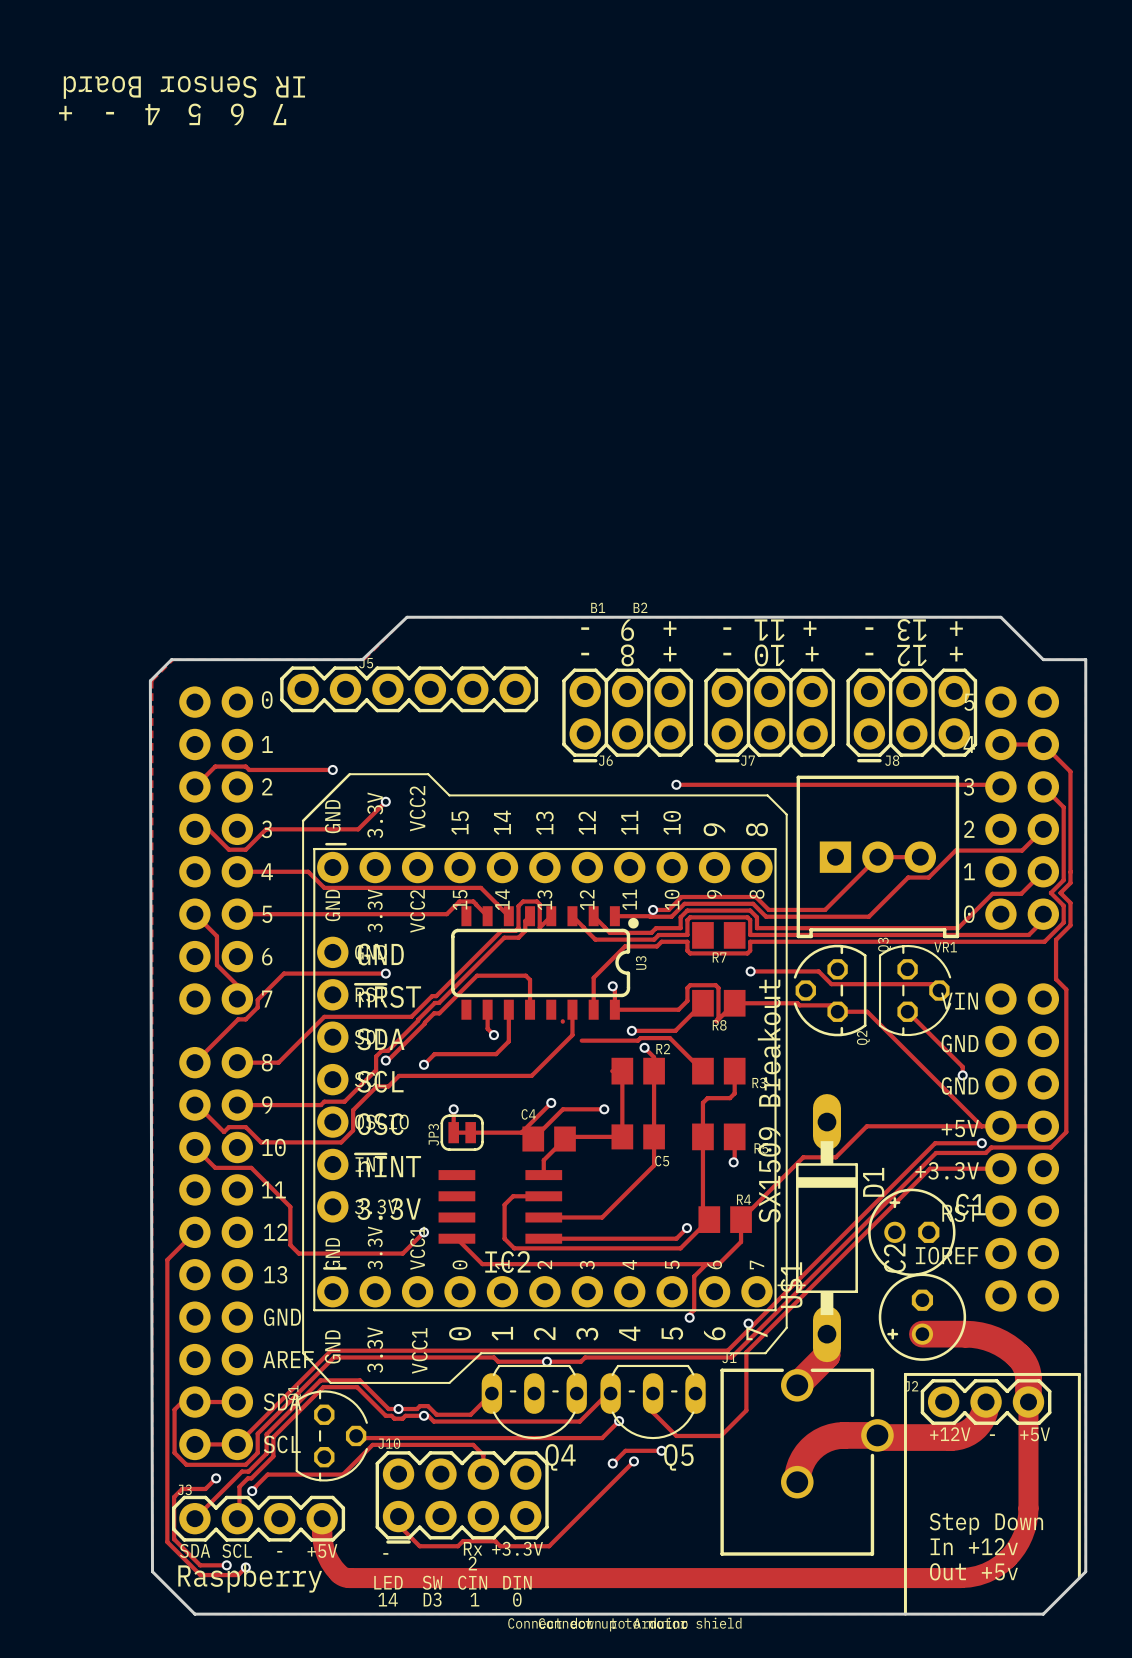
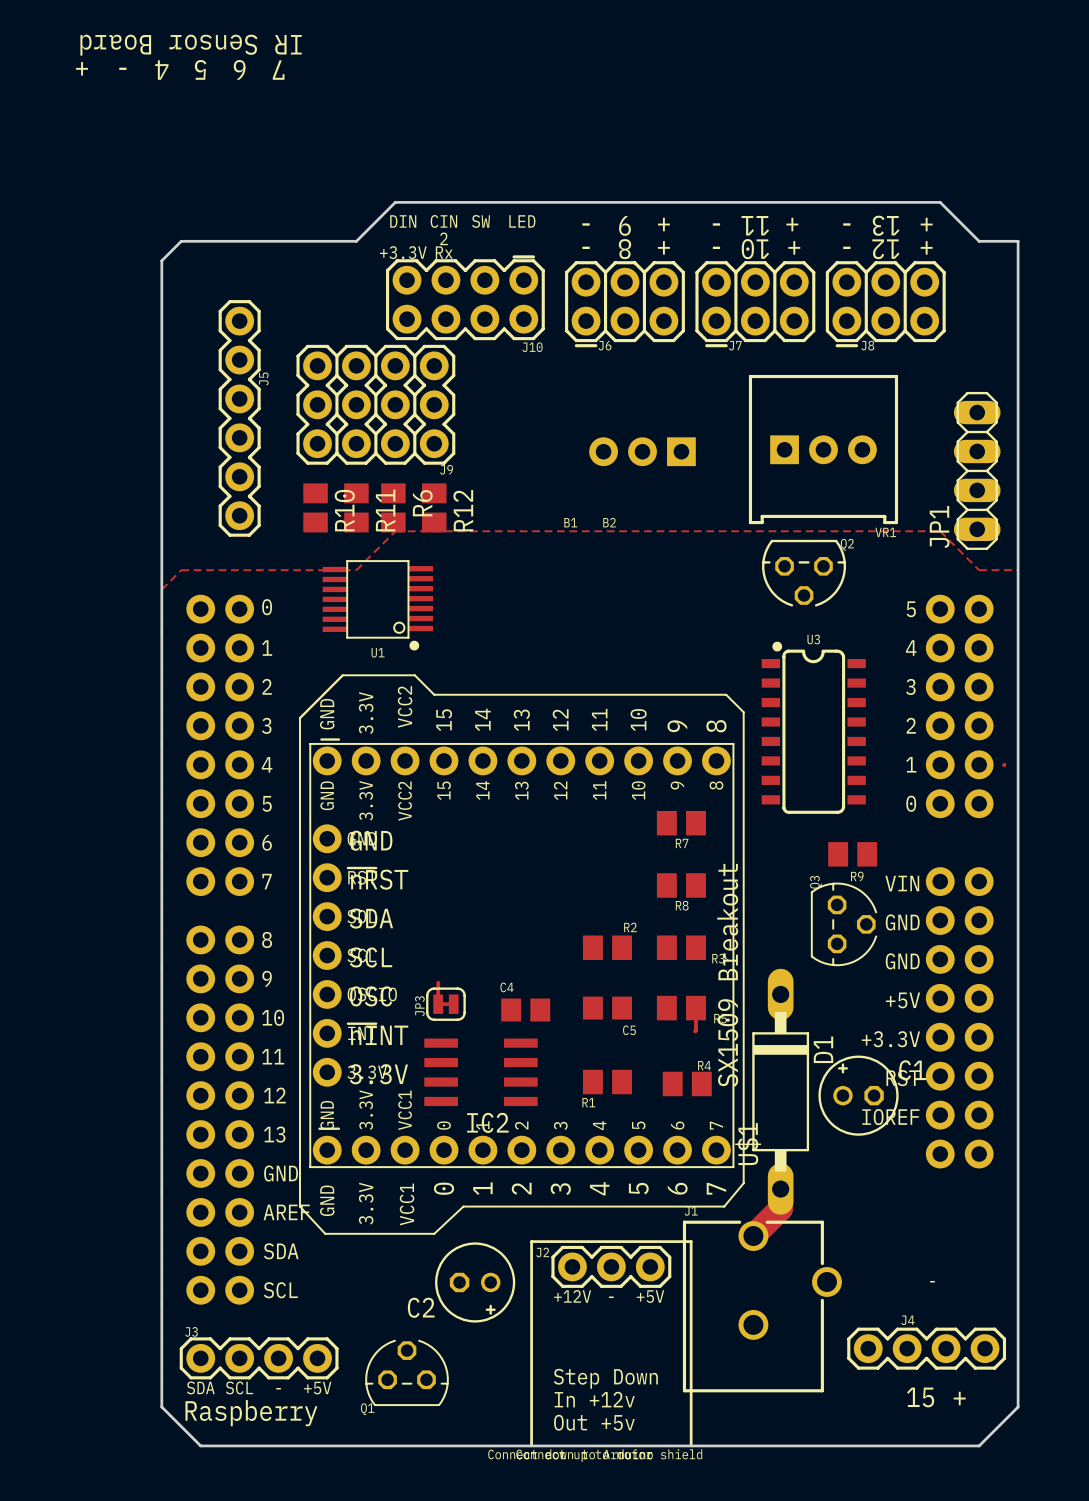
text: none -> DIN (403, 221)
text: none -> CIN (443, 221)
text: none -> SW (481, 221)
text: none -> LED (522, 221)
text: none -> - (586, 224)
text: none -> + (663, 224)
text: none -> - (716, 224)
text: none -> + (792, 224)
text: none -> - (846, 224)
text: none -> + (926, 224)
text: none -> 2 (444, 238)
text: none -> - (586, 247)
text: none -> + (663, 247)
text: none -> - (716, 247)
text: none -> + (794, 247)
text: none -> - (846, 247)
text: none -> + (926, 247)
text: none -> +3.3V (403, 252)
text: none -> Rx (444, 252)
J9: none -> (375, 404)
part: none -> (642, 451)
JP1: none -> (977, 470)
R10: none -> (315, 507)
R11: none -> (356, 507)
R6: none -> (393, 507)
R12: none -> (434, 507)
text: - (585, 628) -> none
text: + (670, 628) -> none
text: - (727, 628) -> none
text: + (810, 628) -> none
text: - (869, 628) -> none
text: + (956, 628) -> none
text position: 11 (769, 629) -> 11 (755, 225)
text position: 13 (912, 629) -> 13 (886, 225)
text position: 9 (627, 630) -> 9 (624, 225)
text: - (585, 654) -> none
text: + (670, 654) -> none
text: - (727, 654) -> none
text: + (812, 654) -> none
text: - (869, 654) -> none
text: + (956, 654) -> none
text position: 8 (627, 655) -> 8 (624, 249)
text position: 10 (769, 655) -> 10 (755, 249)
text position: 12 (911, 655) -> 12 (885, 249)
board edge: (1085, 659) (1043, 659) (1000, 617) (407, 617) (362, 659) (171, 659) (150, 680) (152, 1571) -> (1018, 570) (1018, 241) (979, 241) (940, 202) (395, 202) (356, 241) (181, 241) (161, 260) (161, 1407)
J5 rotation: 0° (409, 689) -> 90° clockwise (239, 418)
J5 position: (409, 689) -> (239, 418)
U1: none -> (377, 605)
J6 position: (627, 715) -> (624, 304)
J7 position: (769, 715) -> (755, 304)
J8 position: (911, 715) -> (885, 304)
track: (1000, 744) (1043, 744) (1070, 771) (1070, 883) (1060, 892) (1070, 902) (1070, 925) (1056, 939) (1056, 979) (1066, 989) (1066, 1132) (1050, 1147) (991, 1147) (985, 1152) (936, 1152) (731, 1357) (585, 1357) (580, 1361) (498, 1361) (493, 1357) (333, 1357) (257, 1433) (257, 1452) (245, 1464) (186, 1464) (174, 1452) (174, 1409) (182, 1402) (237, 1402) -> none
track: (332, 769) (249, 769) (245, 766) (215, 766) (194, 786) -> none
via: (332, 769) -> none
track: (676, 784) (998, 784) (1000, 786) -> none
via: (676, 784) -> none
track: (1043, 786) (1063, 807) (1063, 880) (1050, 892) (1063, 905) (1063, 922) (1044, 941) (750, 941) (750, 950) (747, 953) (690, 953) (687, 950) (687, 941) (661, 941) (656, 946) (625, 946) (593, 977) (593, 1009) -> none
track: (385, 801) (358, 829) (266, 829) (245, 849) (228, 849) (208, 829) (194, 829) -> none
via: (385, 801) -> none
track: (1043, 829) (1022, 850) (955, 850) (928, 877) (908, 877) (868, 916) (766, 916) (753, 903) (684, 903) (671, 916) (614, 916) -> none
VR1 position: (877, 856) -> (823, 449)
track: (920, 857) (877, 857) (825, 909) (768, 909) (755, 897) (681, 897) (668, 909) (653, 909) -> none
track: (237, 871) (308, 871) (324, 887) (480, 887) (508, 916) -> none
track: (1043, 871) (1021, 893) (992, 893) (958, 928) (756, 928) (756, 917) (750, 910) (687, 910) (680, 917) (680, 928) (656, 928) (651, 932) (609, 932) (593, 916) -> none
via: (653, 909) -> none
track: (194, 914) (216, 936) (216, 965) (237, 985) (237, 999) -> none
track: (237, 914) (446, 914) (459, 901) (473, 901) (487, 916) -> none
track: (1043, 914) (1043, 920) (1028, 934) (750, 934) (750, 920) (747, 917) (690, 917) (687, 920) (687, 934) (658, 934) (654, 939) (595, 939) (572, 916) -> none
track: (530, 916) (525, 920) (525, 930) (518, 937) (504, 937) (439, 1002) (434, 1002) (388, 1050) (381, 1050) (376, 1056) (376, 1070) (344, 1101) (324, 1101) (320, 1105) (237, 1105) -> none
track: (551, 916) (539, 927) (539, 904) (536, 901) (523, 901) (518, 906) (518, 928) (515, 930) (501, 930) (436, 996) (432, 996) (411, 1016) (324, 1016) (278, 1062) (237, 1062) -> none
U3 rotation: 0° (544, 962) -> 90° counterclockwise (813, 727)
U3 position: (544, 962) -> (813, 727)
R9: none -> (852, 854)
track: (750, 971) (818, 971) (831, 984) (933, 984) (939, 990) -> none
via: (750, 971) -> none
track: (385, 973) (284, 973) (257, 999) (257, 1007) (245, 1019) (238, 1019) (194, 1062) -> none
via: (385, 973) -> none
track: (612, 986) (614, 988) (614, 1009) (678, 1009) (687, 1000) (687, 987) (690, 985) (715, 985) (718, 987) (718, 1018) (716, 1021) (734, 1003) (831, 1005) (837, 1011) (867, 1011) (981, 1126) -> none
via: (612, 986) -> none
Q2 rotation: 0° (830, 990) -> 90° counterclockwise (804, 573)
Q2 position: (830, 990) -> (804, 573)
Q3 position: (915, 990) -> (843, 924)
track: (702, 1003) (675, 1030) (631, 1030) -> none
track: (487, 1009) (487, 1028) (493, 1035) -> none
track: (508, 1009) (508, 1041) (496, 1054) (434, 1054) (423, 1064) -> none
track: (530, 1009) (530, 979) (525, 975) (477, 975) (439, 1013) (434, 1013) (385, 1060) -> none
track: (572, 1009) (572, 1035) (531, 1075) (399, 1075) (388, 1086) (376, 1086) (353, 1110) (353, 1130) (341, 1142) (261, 1142) (245, 1127) (228, 1127) (224, 1132) (194, 1105) -> none
track: (907, 1011) (962, 1066) (962, 1075) -> none
track: (562, 1021) (562, 1021) -> none
via: (631, 1030) -> none
via: (493, 1035) -> none
track: (581, 1040) (638, 1040) (640, 1038) (669, 1038) (702, 1071) -> none
track: (644, 1047) (654, 1057) (654, 1165) (602, 1217) (543, 1217) -> none
via: (644, 1047) -> none
via: (385, 1060) -> none
via: (423, 1064) -> none
track: (612, 1071) (622, 1071) (622, 1136) (567, 1136) (543, 1160) (543, 1175) -> none
track: (734, 1071) (734, 1093) (729, 1098) (707, 1098) (702, 1102) (702, 1213) (709, 1219) (680, 1248) (514, 1248) (504, 1238) (504, 1204) (513, 1196) (543, 1196) -> none
via: (962, 1075) -> none
track: (551, 1102) (521, 1132) (470, 1132) -> none
via: (551, 1102) -> none
via: (453, 1109) -> none
track: (604, 1109) (562, 1109) (533, 1139) -> none
via: (604, 1109) -> none
track: (1043, 1126) (866, 1126) (835, 1157) (803, 1157) (741, 1219) (741, 1241) (718, 1264) (482, 1264) (456, 1238) -> none
track: (981, 1143) (935, 1143) (727, 1350) (331, 1350) (237, 1444) (194, 1444) -> none
via: (981, 1143) -> none
track: (194, 1147) (215, 1167) (251, 1167) (290, 1206) (290, 1245) (298, 1253) (402, 1253) (423, 1232) -> none
via: (733, 1162) -> none
track: (1000, 1168) (929, 1168) (746, 1352) (746, 1410) (720, 1435) (676, 1435) (653, 1412) (653, 1393) -> none
R1: none -> (607, 1082)
track: (687, 1228) (676, 1238) (543, 1238) -> none
via: (687, 1228) -> none
track: (194, 1232) (167, 1259) (167, 1542) (200, 1575) (238, 1575) (245, 1567) -> none
via: (423, 1232) -> none
track: (706, 1264) (694, 1276) (694, 1309) (688, 1316) (689, 1317) -> none
via: (689, 1317) -> none
C2 rotation: 0° (922, 1317) -> 90° counterclockwise (475, 1282)
C2 position: (922, 1317) -> (475, 1282)
via: (748, 1323) -> none
track: (922, 1334) (972, 1334) (987, 1337) (1013, 1351) (1021, 1359) (1027, 1371) (1027, 1522) (1020, 1541) (1007, 1558) (993, 1569) (977, 1575) (960, 1578) (347, 1577) (338, 1573) (326, 1555) (322, 1540) (322, 1518) -> none
via: (547, 1361) -> none
track: (491, 1393) (470, 1414) (436, 1414) (428, 1406) (419, 1406) (417, 1409) (388, 1409) (359, 1380) (320, 1380) (266, 1434) (266, 1453) (248, 1471) (242, 1471) (194, 1518) -> none
track: (610, 1393) (607, 1393) (579, 1421) (433, 1421) (428, 1415) (405, 1415) (402, 1418) (385, 1415) (357, 1387) (323, 1387) (273, 1437) (273, 1456) (251, 1478) (247, 1478) (239, 1486) (239, 1516) (237, 1518) -> none
Q4: (534, 1402) -> none
Q5: (653, 1402) -> none
track: (986, 1402) (983, 1415) (978, 1423) (972, 1430) (959, 1436) (879, 1437) (877, 1435) (844, 1435) (826, 1438) (815, 1445) (806, 1453) (798, 1470) (797, 1482) -> none
J2 position: (986, 1402) -> (611, 1266)
via: (398, 1409) -> none
via: (423, 1415) -> none
track: (619, 1421) (602, 1438) (358, 1438) (356, 1435) -> none
via: (619, 1421) -> none
text position: +12V (950, 1434) -> +12V (572, 1296)
text position: +5V (1035, 1434) -> +5V (650, 1296)
Q1 rotation: 0° (331, 1435) -> 90° counterclockwise (406, 1372)
Q1 position: (331, 1435) -> (406, 1372)
track: (661, 1450) (625, 1450) (612, 1463) -> none
via: (661, 1450) -> none
track: (633, 1461) (549, 1546) (500, 1546) (495, 1541) (462, 1541) (457, 1546) (419, 1546) (398, 1525) (398, 1516) -> none
via: (633, 1461) -> none
via: (612, 1463) -> none
track: (483, 1474) (483, 1455) (473, 1444) (372, 1444) (342, 1474) (267, 1474) (252, 1491) -> none
track: (216, 1478) (205, 1488) (182, 1488) (174, 1497) (174, 1539) (200, 1565) (226, 1565) -> none
via: (216, 1478) -> none
via: (252, 1491) -> none
J10 rotation: 0° (462, 1497) -> 180° (465, 297)
J10 position: (462, 1497) -> (465, 297)
J4: none -> (926, 1348)
text position: Step Down (986, 1523) -> Step Down (605, 1378)
text position: In +12v (974, 1546) -> In +12v (594, 1399)
text: Rx (473, 1548) -> none
text: +3.3V (517, 1548) -> none
text position: - (385, 1553) -> - (611, 1297)
text: none -> 15 (920, 1397)
text: none -> + (959, 1398)
text: 2 (472, 1563) -> none
via: (226, 1565) -> none
via: (245, 1567) -> none
text position: Out +5v (973, 1571) -> Out +5v (594, 1422)
line: (1079, 1578) (1079, 1374) (905, 1374) (905, 1614) -> none
text: LED (388, 1582) -> none
text: SW (432, 1582) -> none
text: CIN (472, 1582) -> none
text: DIN (517, 1582) -> none
text: 14 (388, 1599) -> none
text: D3 (432, 1599) -> none
text: 1 (474, 1599) -> none
text: 0 (517, 1599) -> none
line: none -> (531, 1445) (531, 1241) (691, 1241) (691, 1445)

